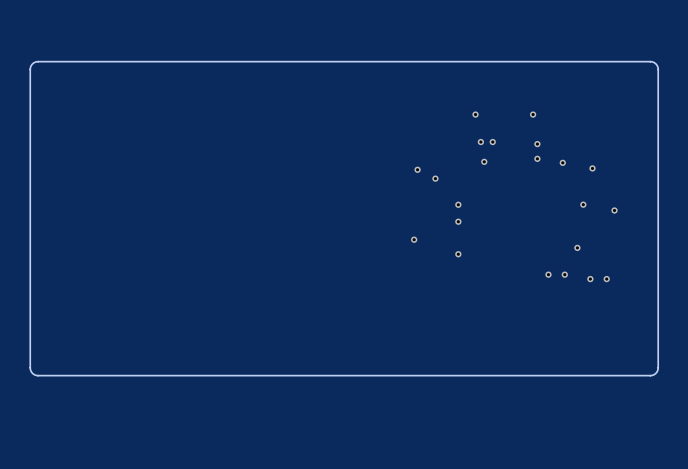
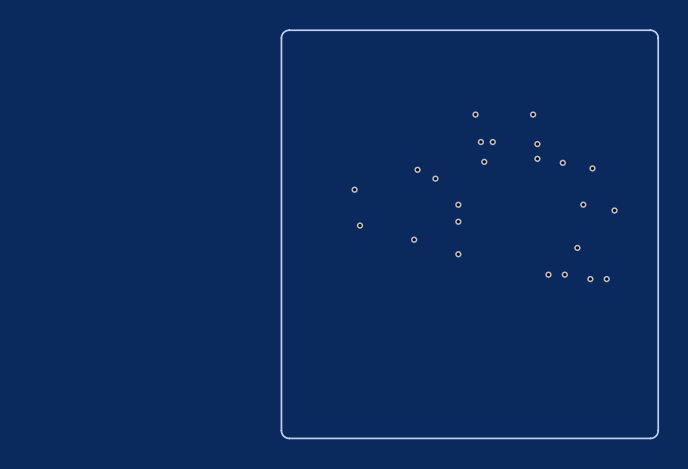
board edge: (658, 69) (655, 63) (650, 61) (38, 61) (32, 63) (30, 69) (30, 367) (34, 374) (650, 375) (655, 373) (658, 367) -> (658, 69) (658, 36) (651, 30) (289, 30) (283, 32) (281, 38) (281, 432) (284, 436) (289, 438) (652, 438) (658, 431) (658, 367)
via: none -> (354, 189)
via: none -> (359, 225)

